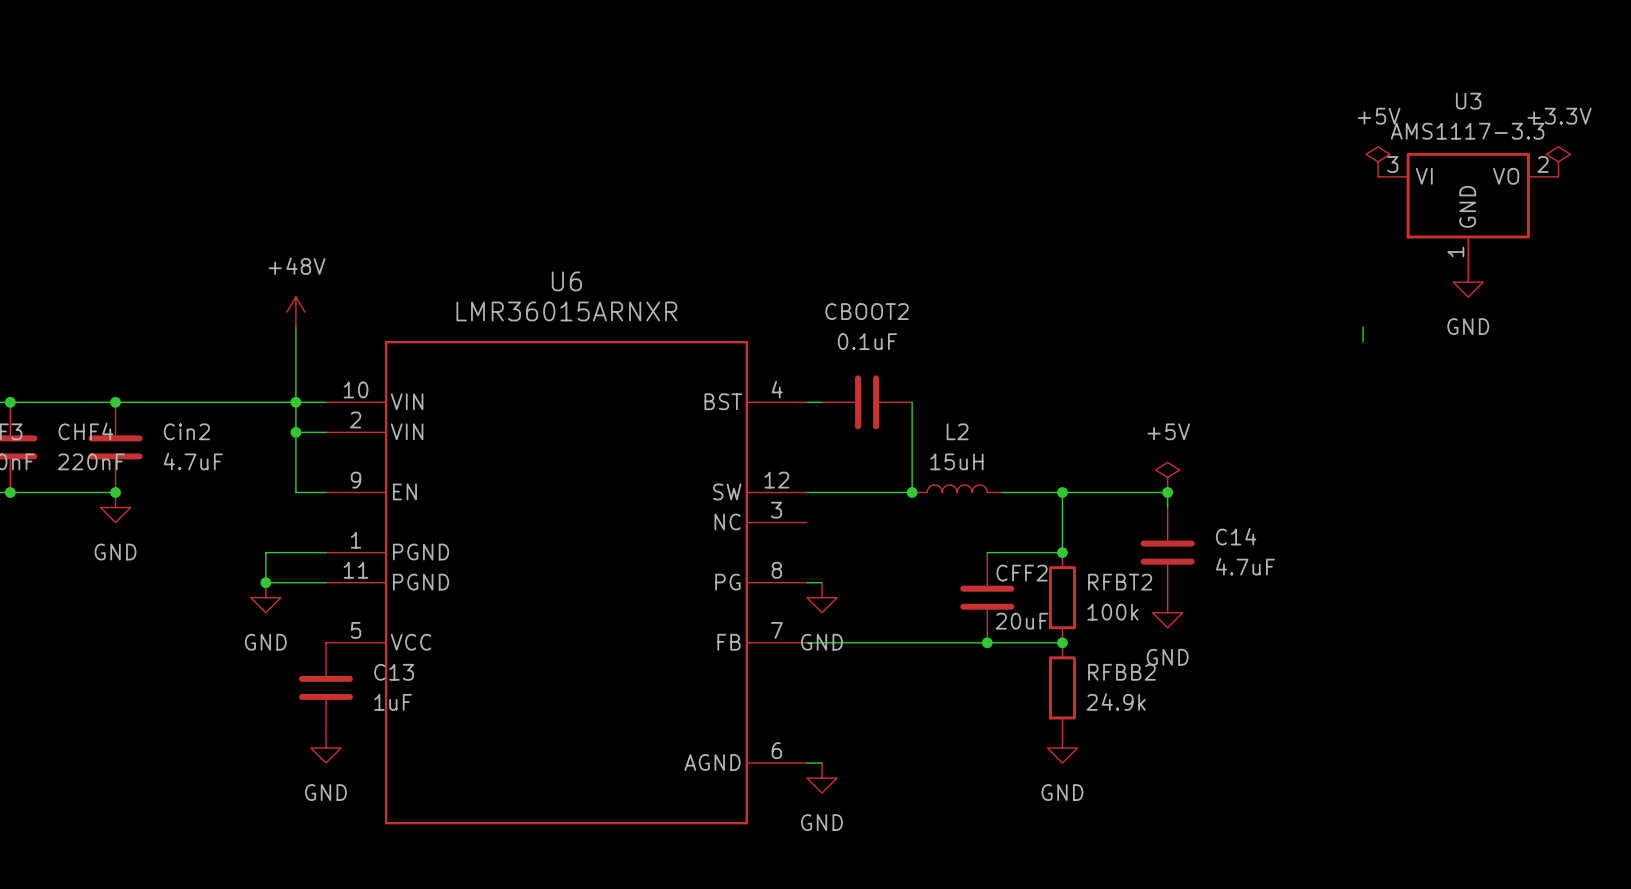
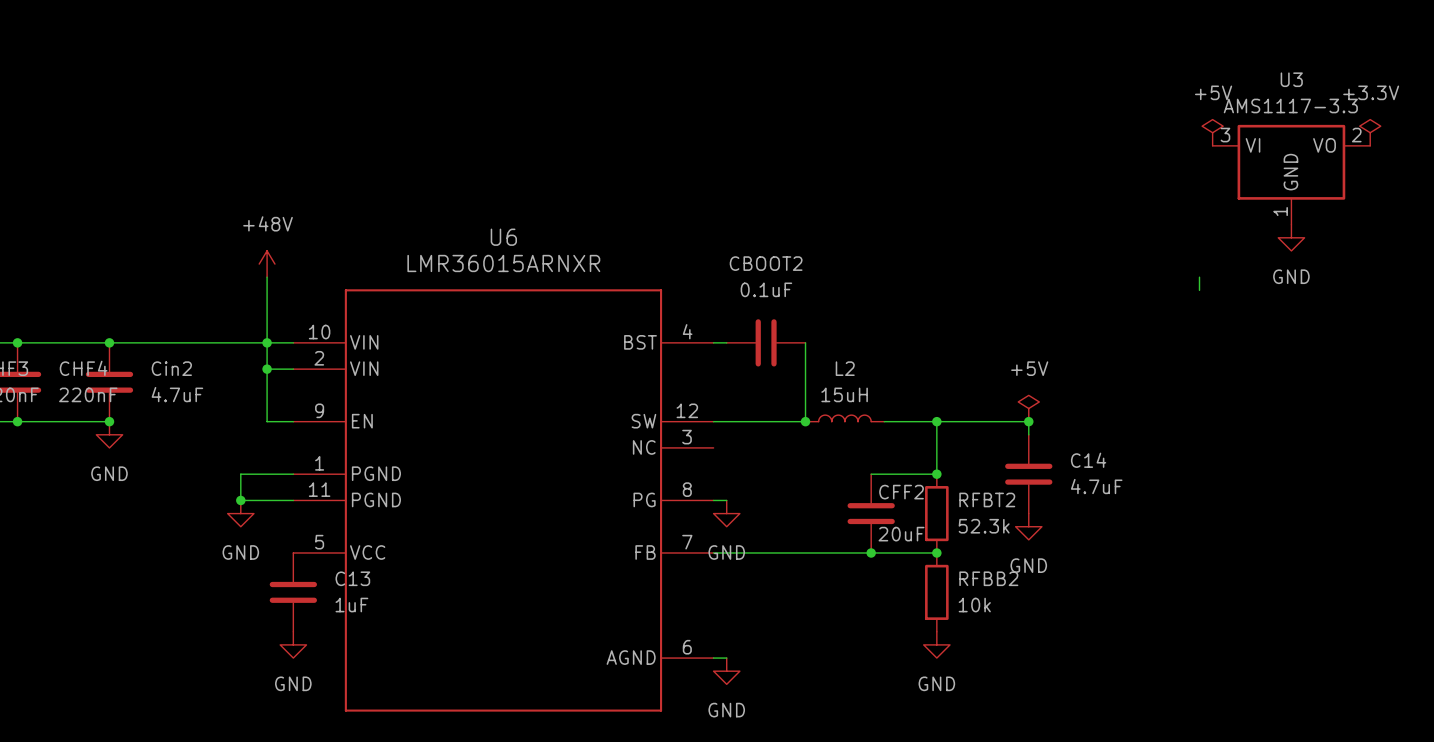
RFBT2 value: 100k (1113, 612) -> 52.3k (984, 526)
RFBB2 value: 24.9k (1116, 702) -> 10k (974, 605)

